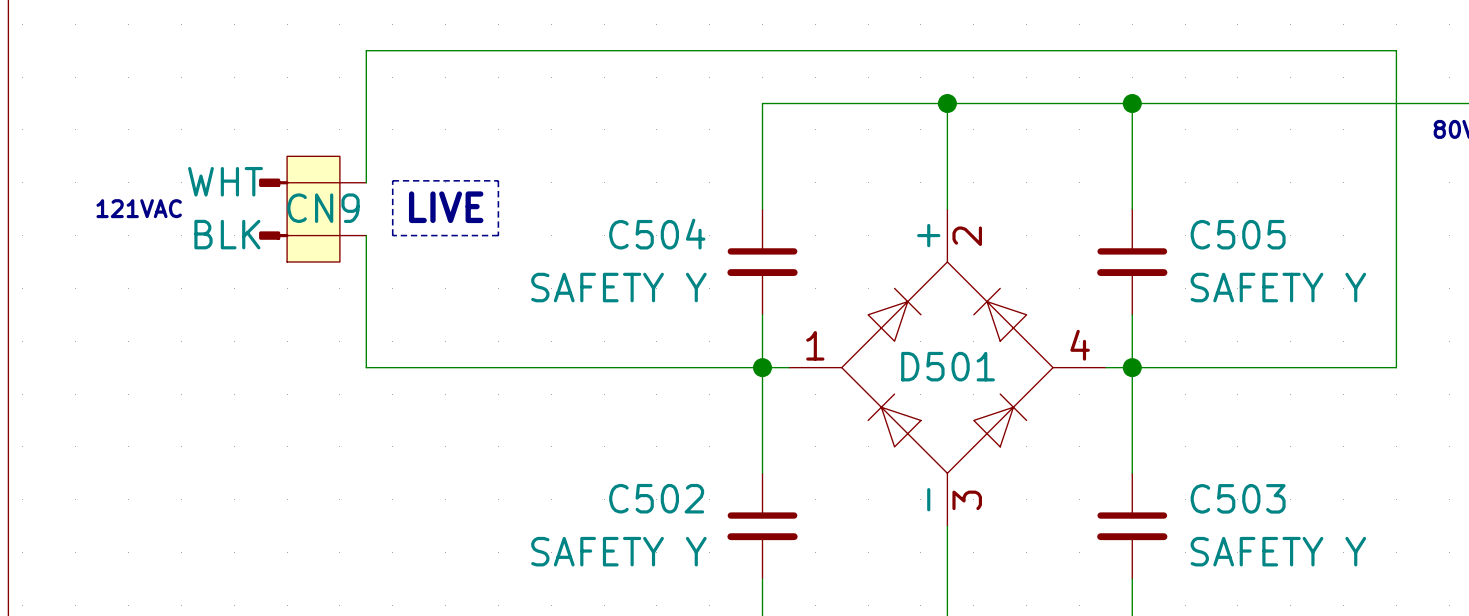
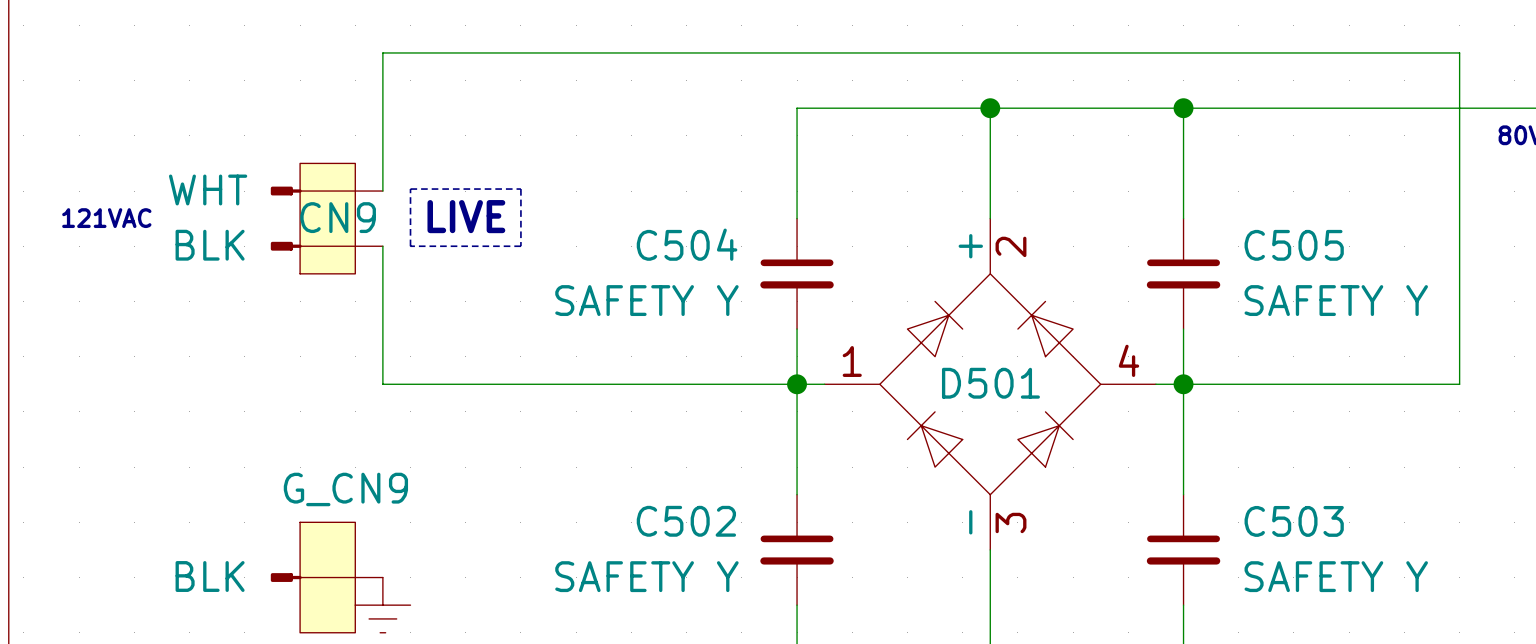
CN9 symbol: [259, 156, 367, 262] -> [270, 163, 383, 274]
text position: 121VAC (139, 208) -> 121VAC (106, 218)
G_CN9: none -> (326, 577)
power symbol: none -> (382, 605)

